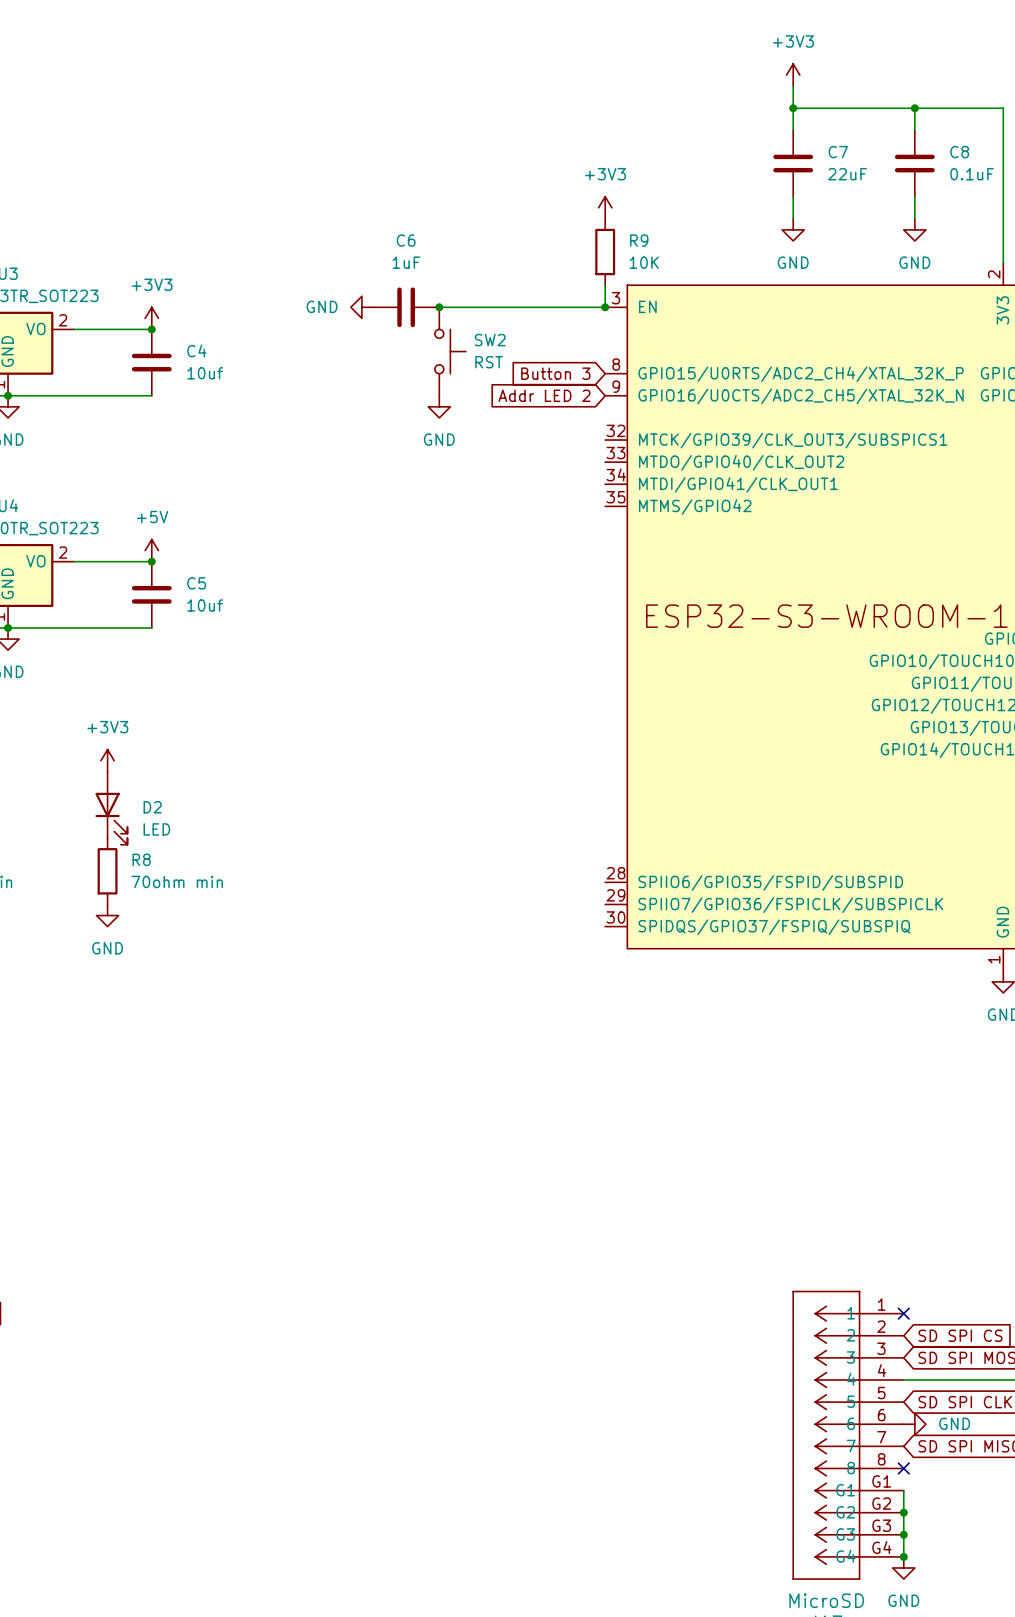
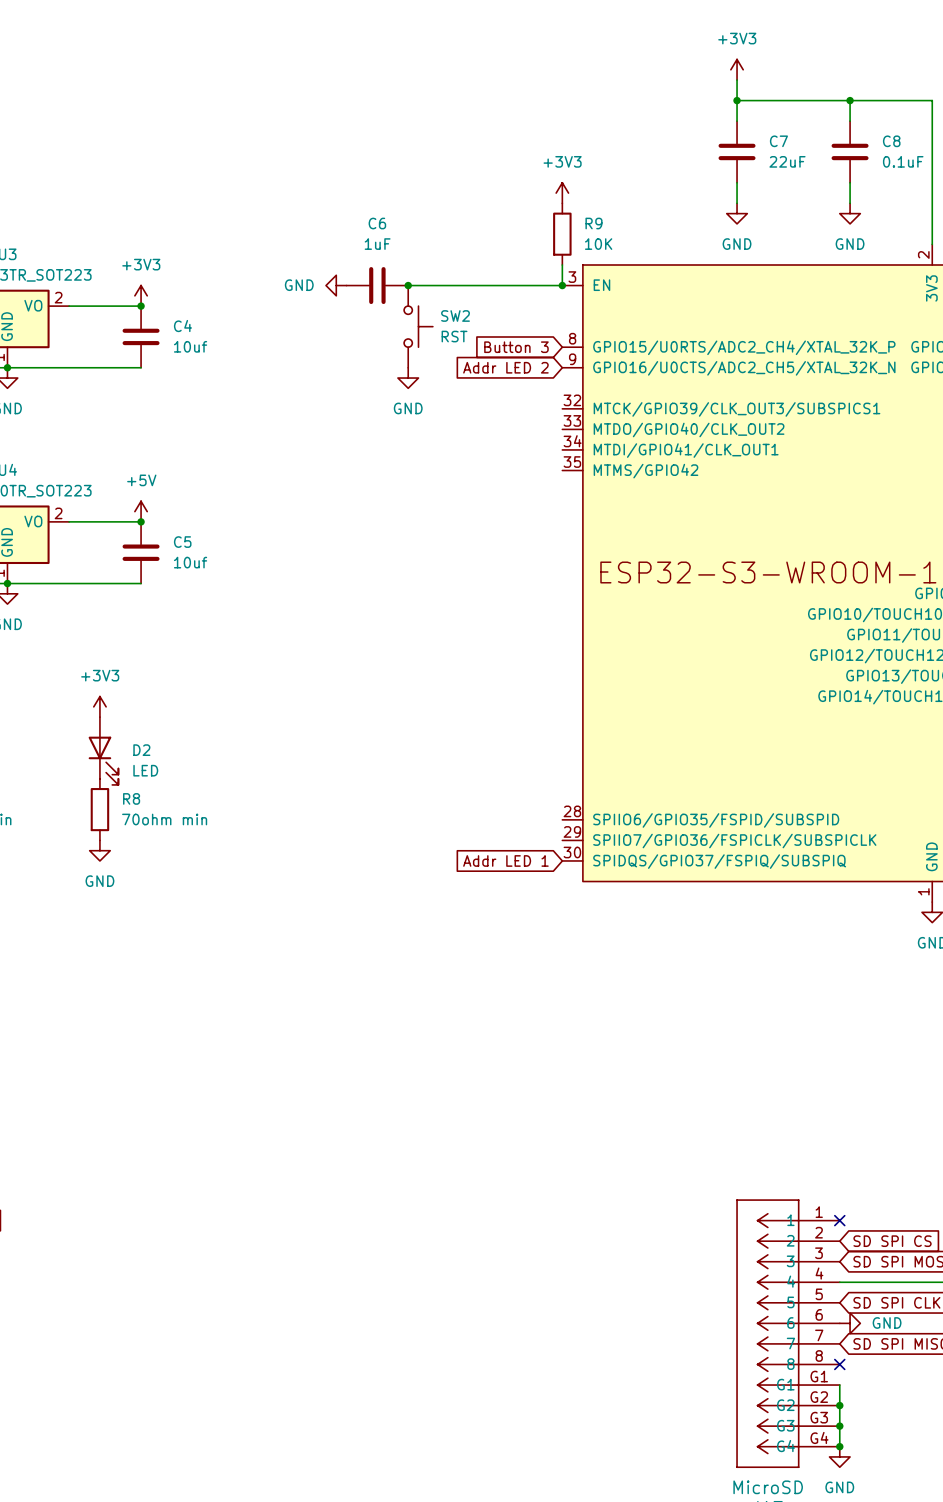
global label: none -> Addr LED 1 (505, 860)

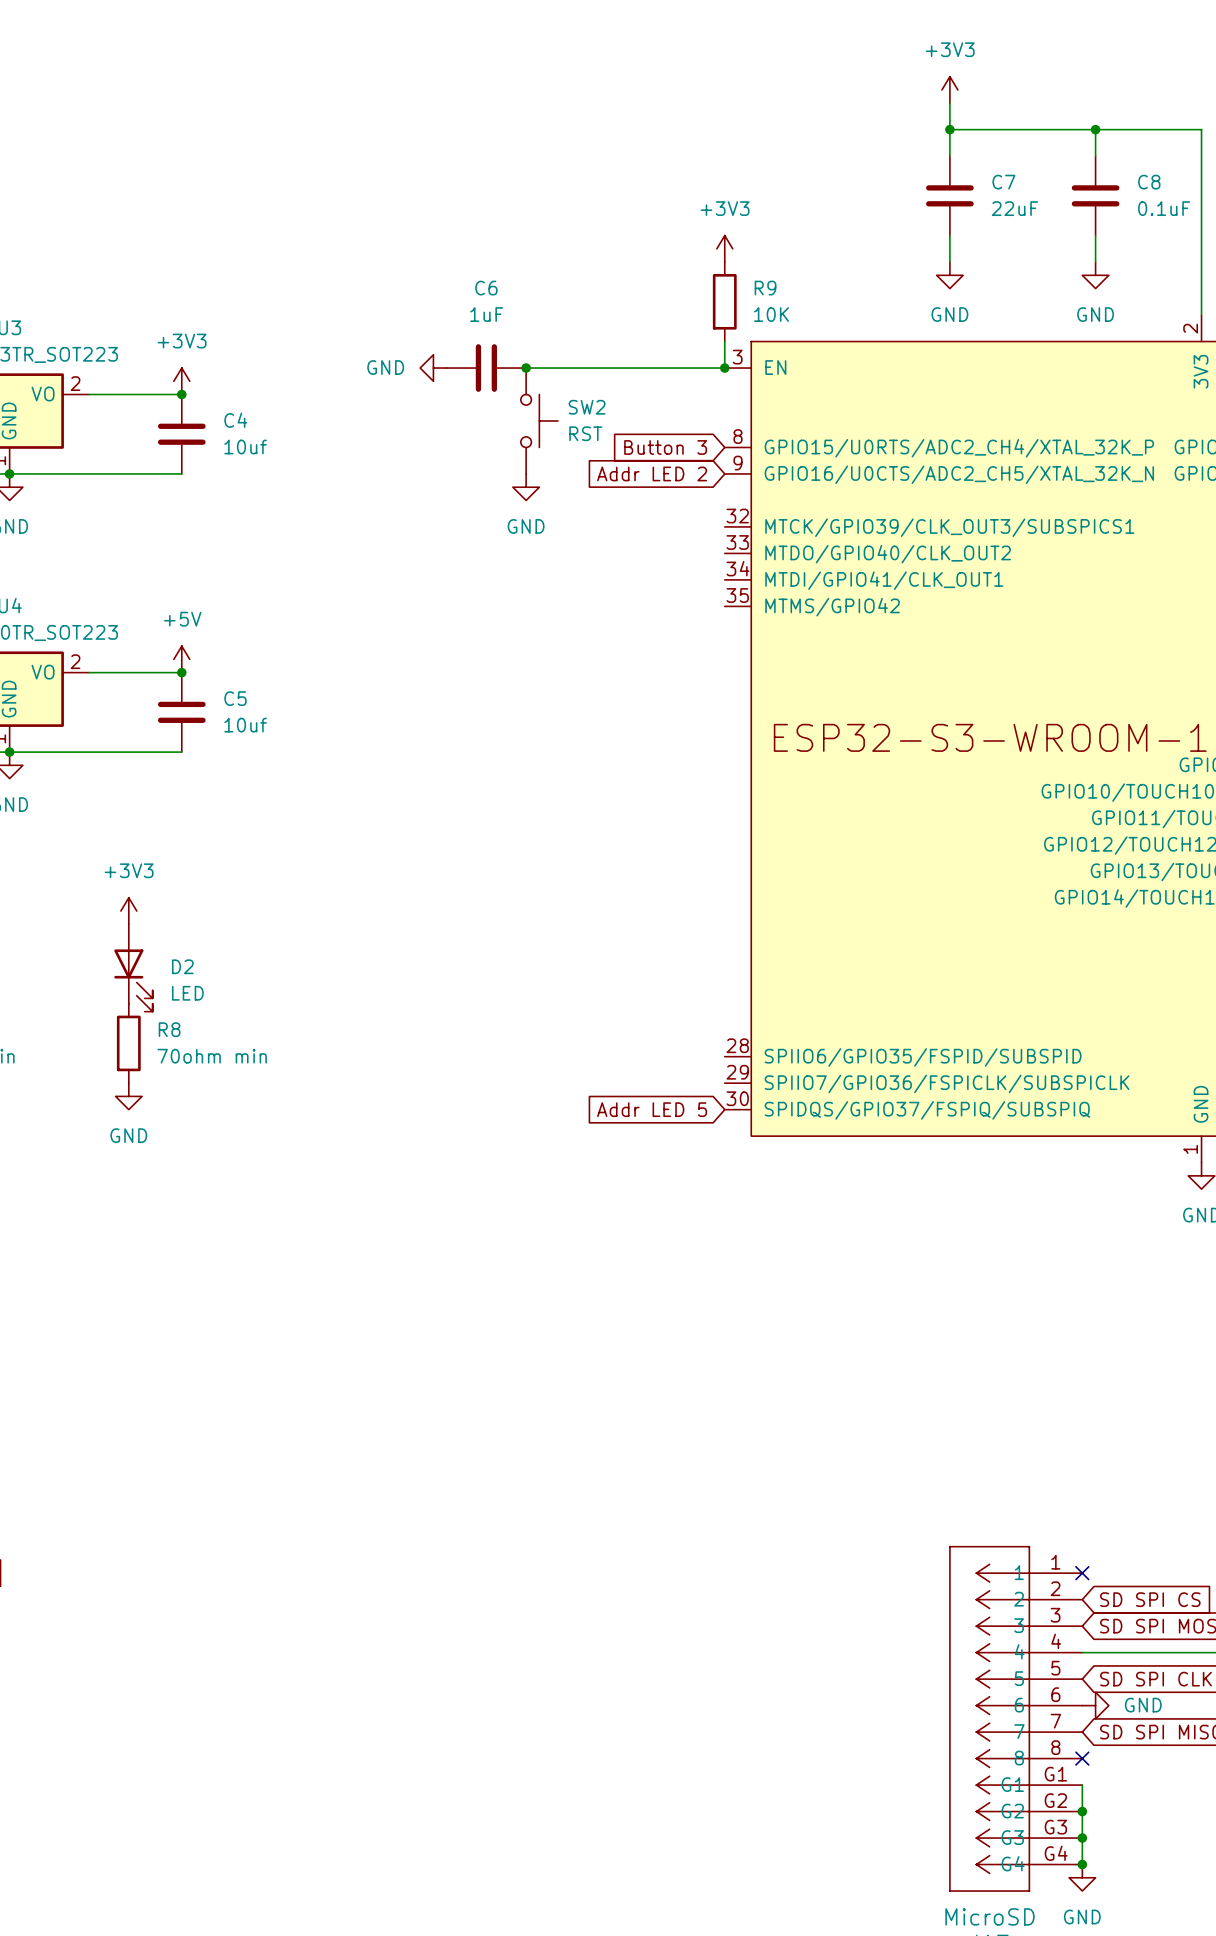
global label: Addr LED 1 (505, 860) -> Addr LED 5 (652, 1109)

